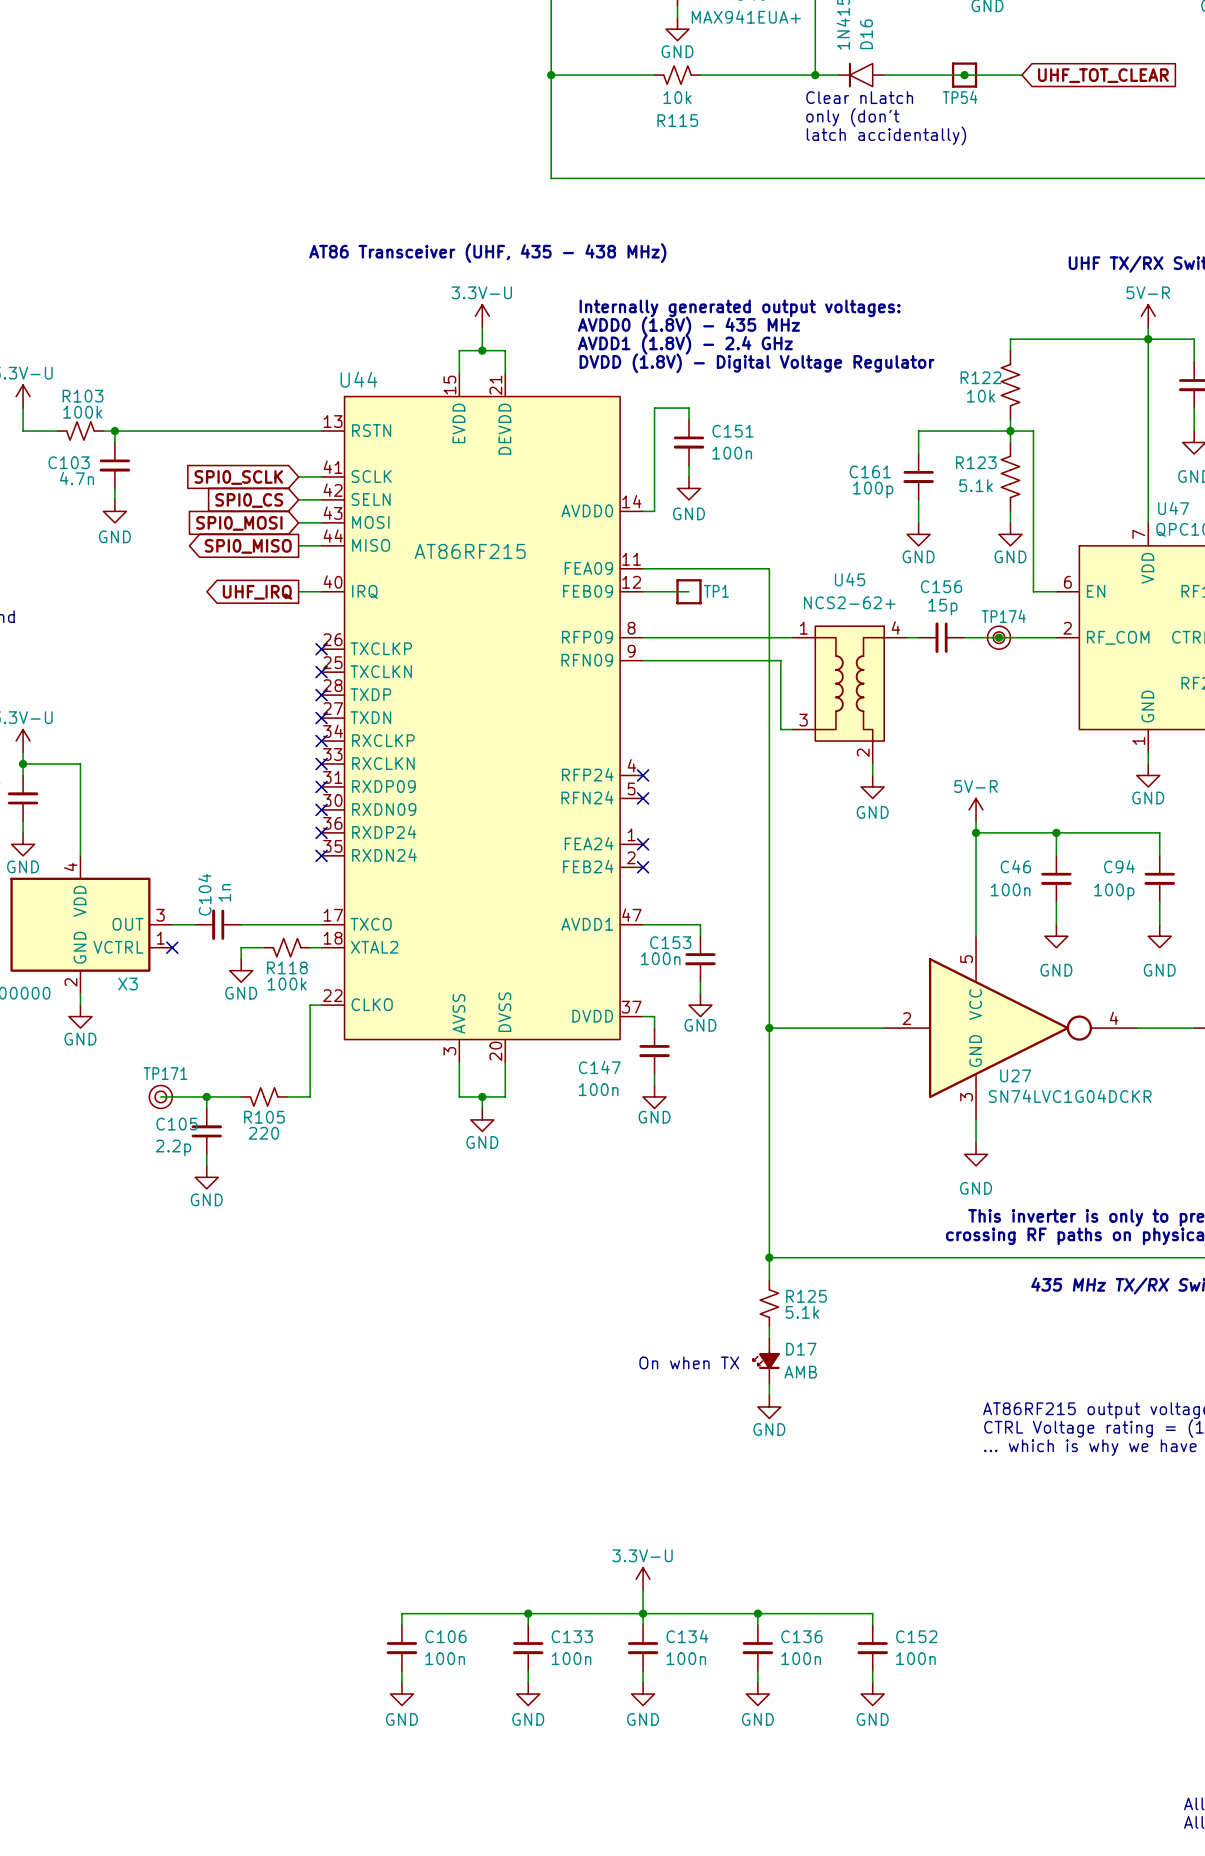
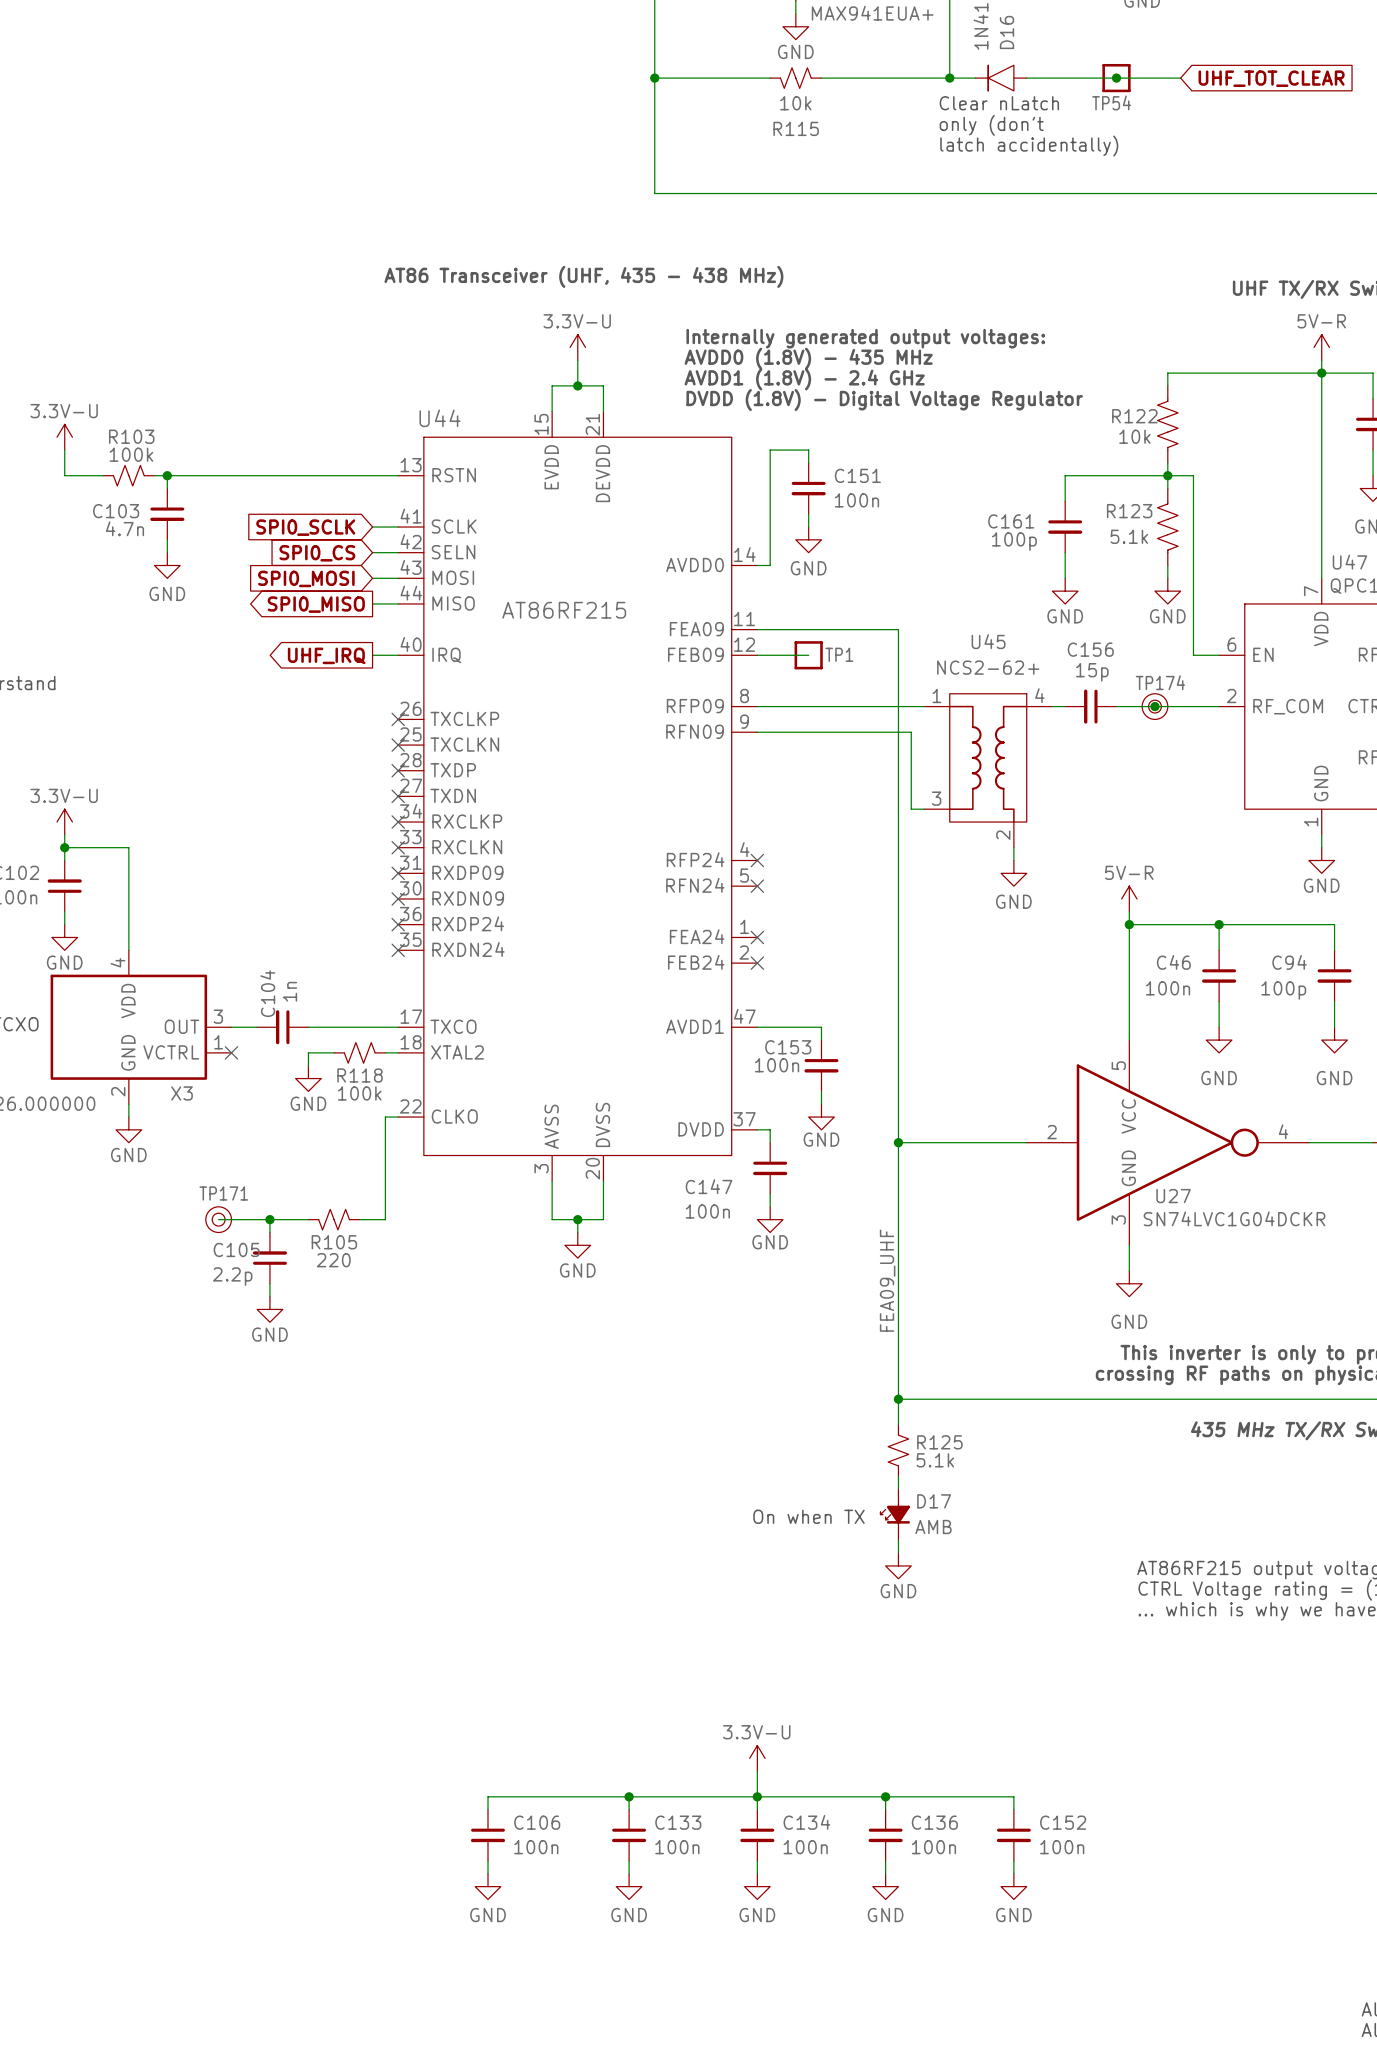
label: none -> FEA09_UHF (887, 1280)

